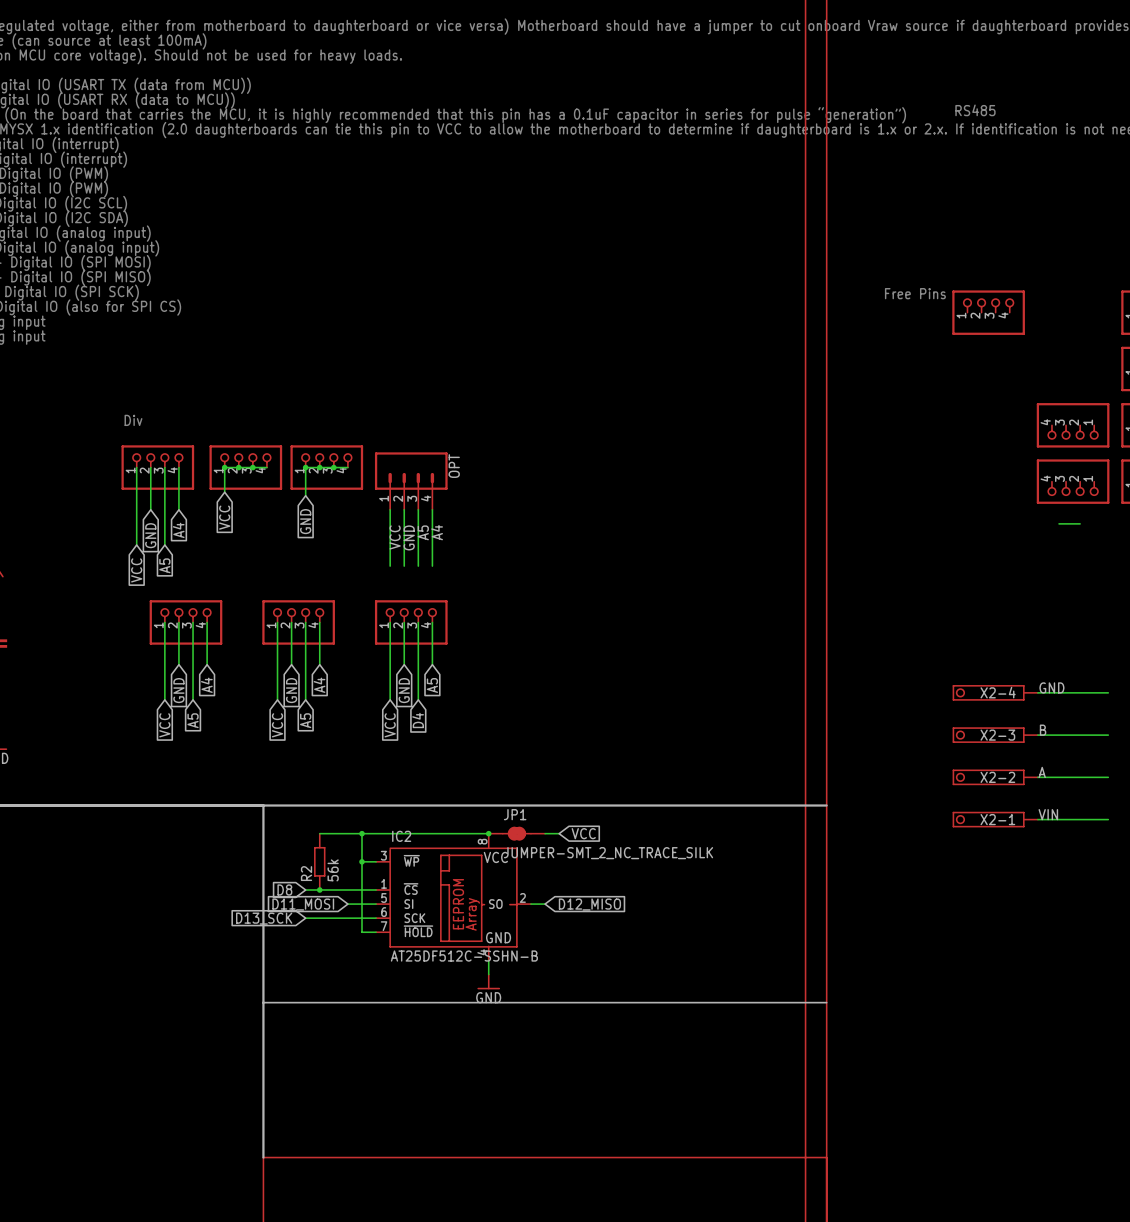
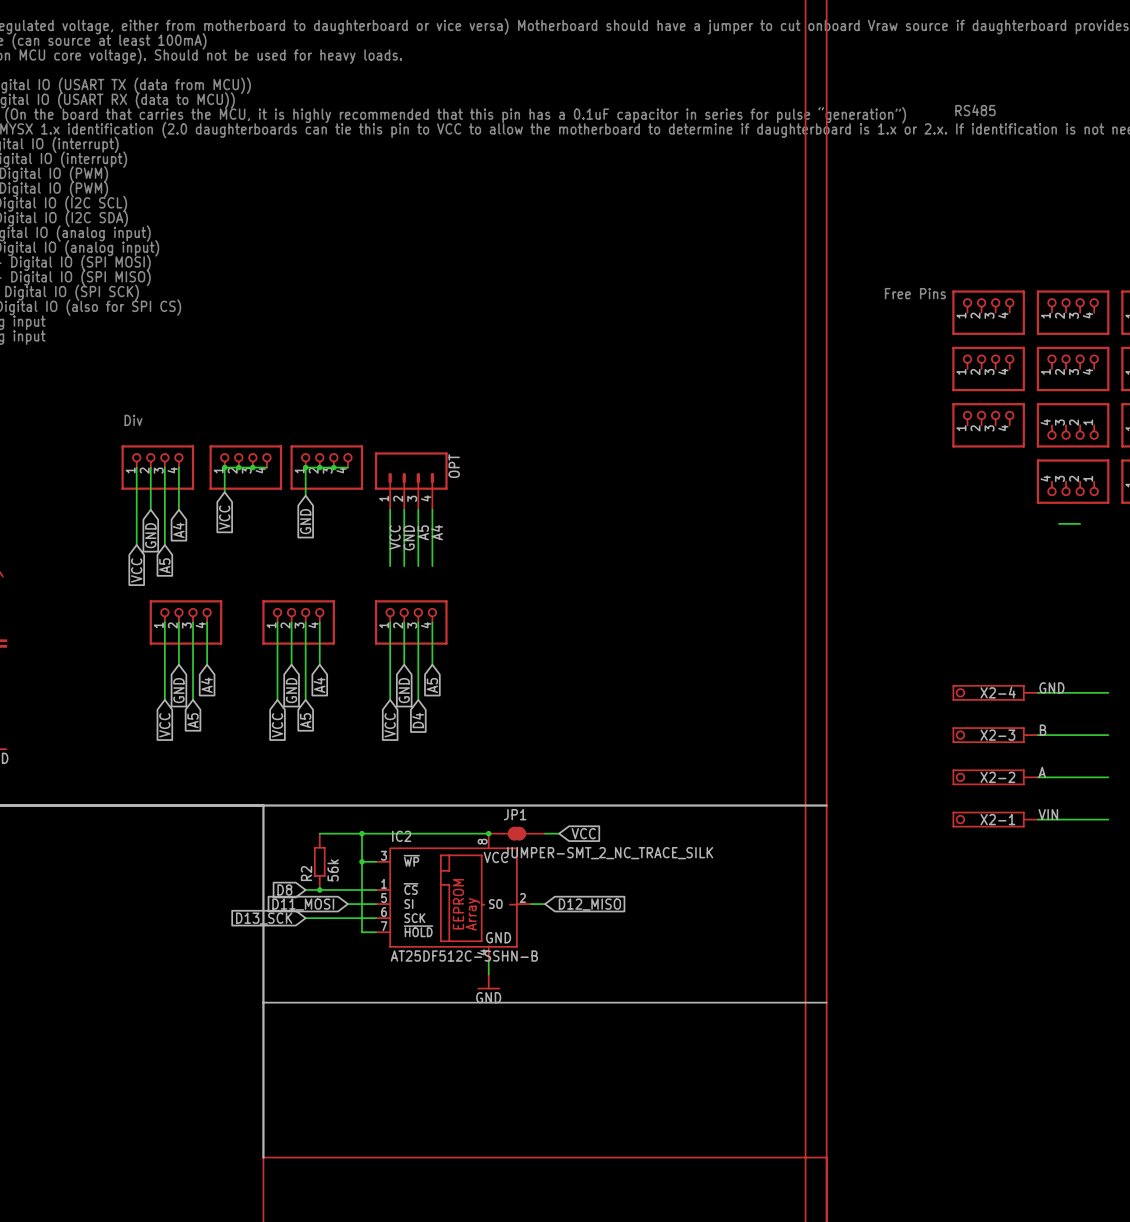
part: none -> (1073, 312)
part: none -> (988, 368)
part: none -> (1073, 368)
part: none -> (988, 425)

